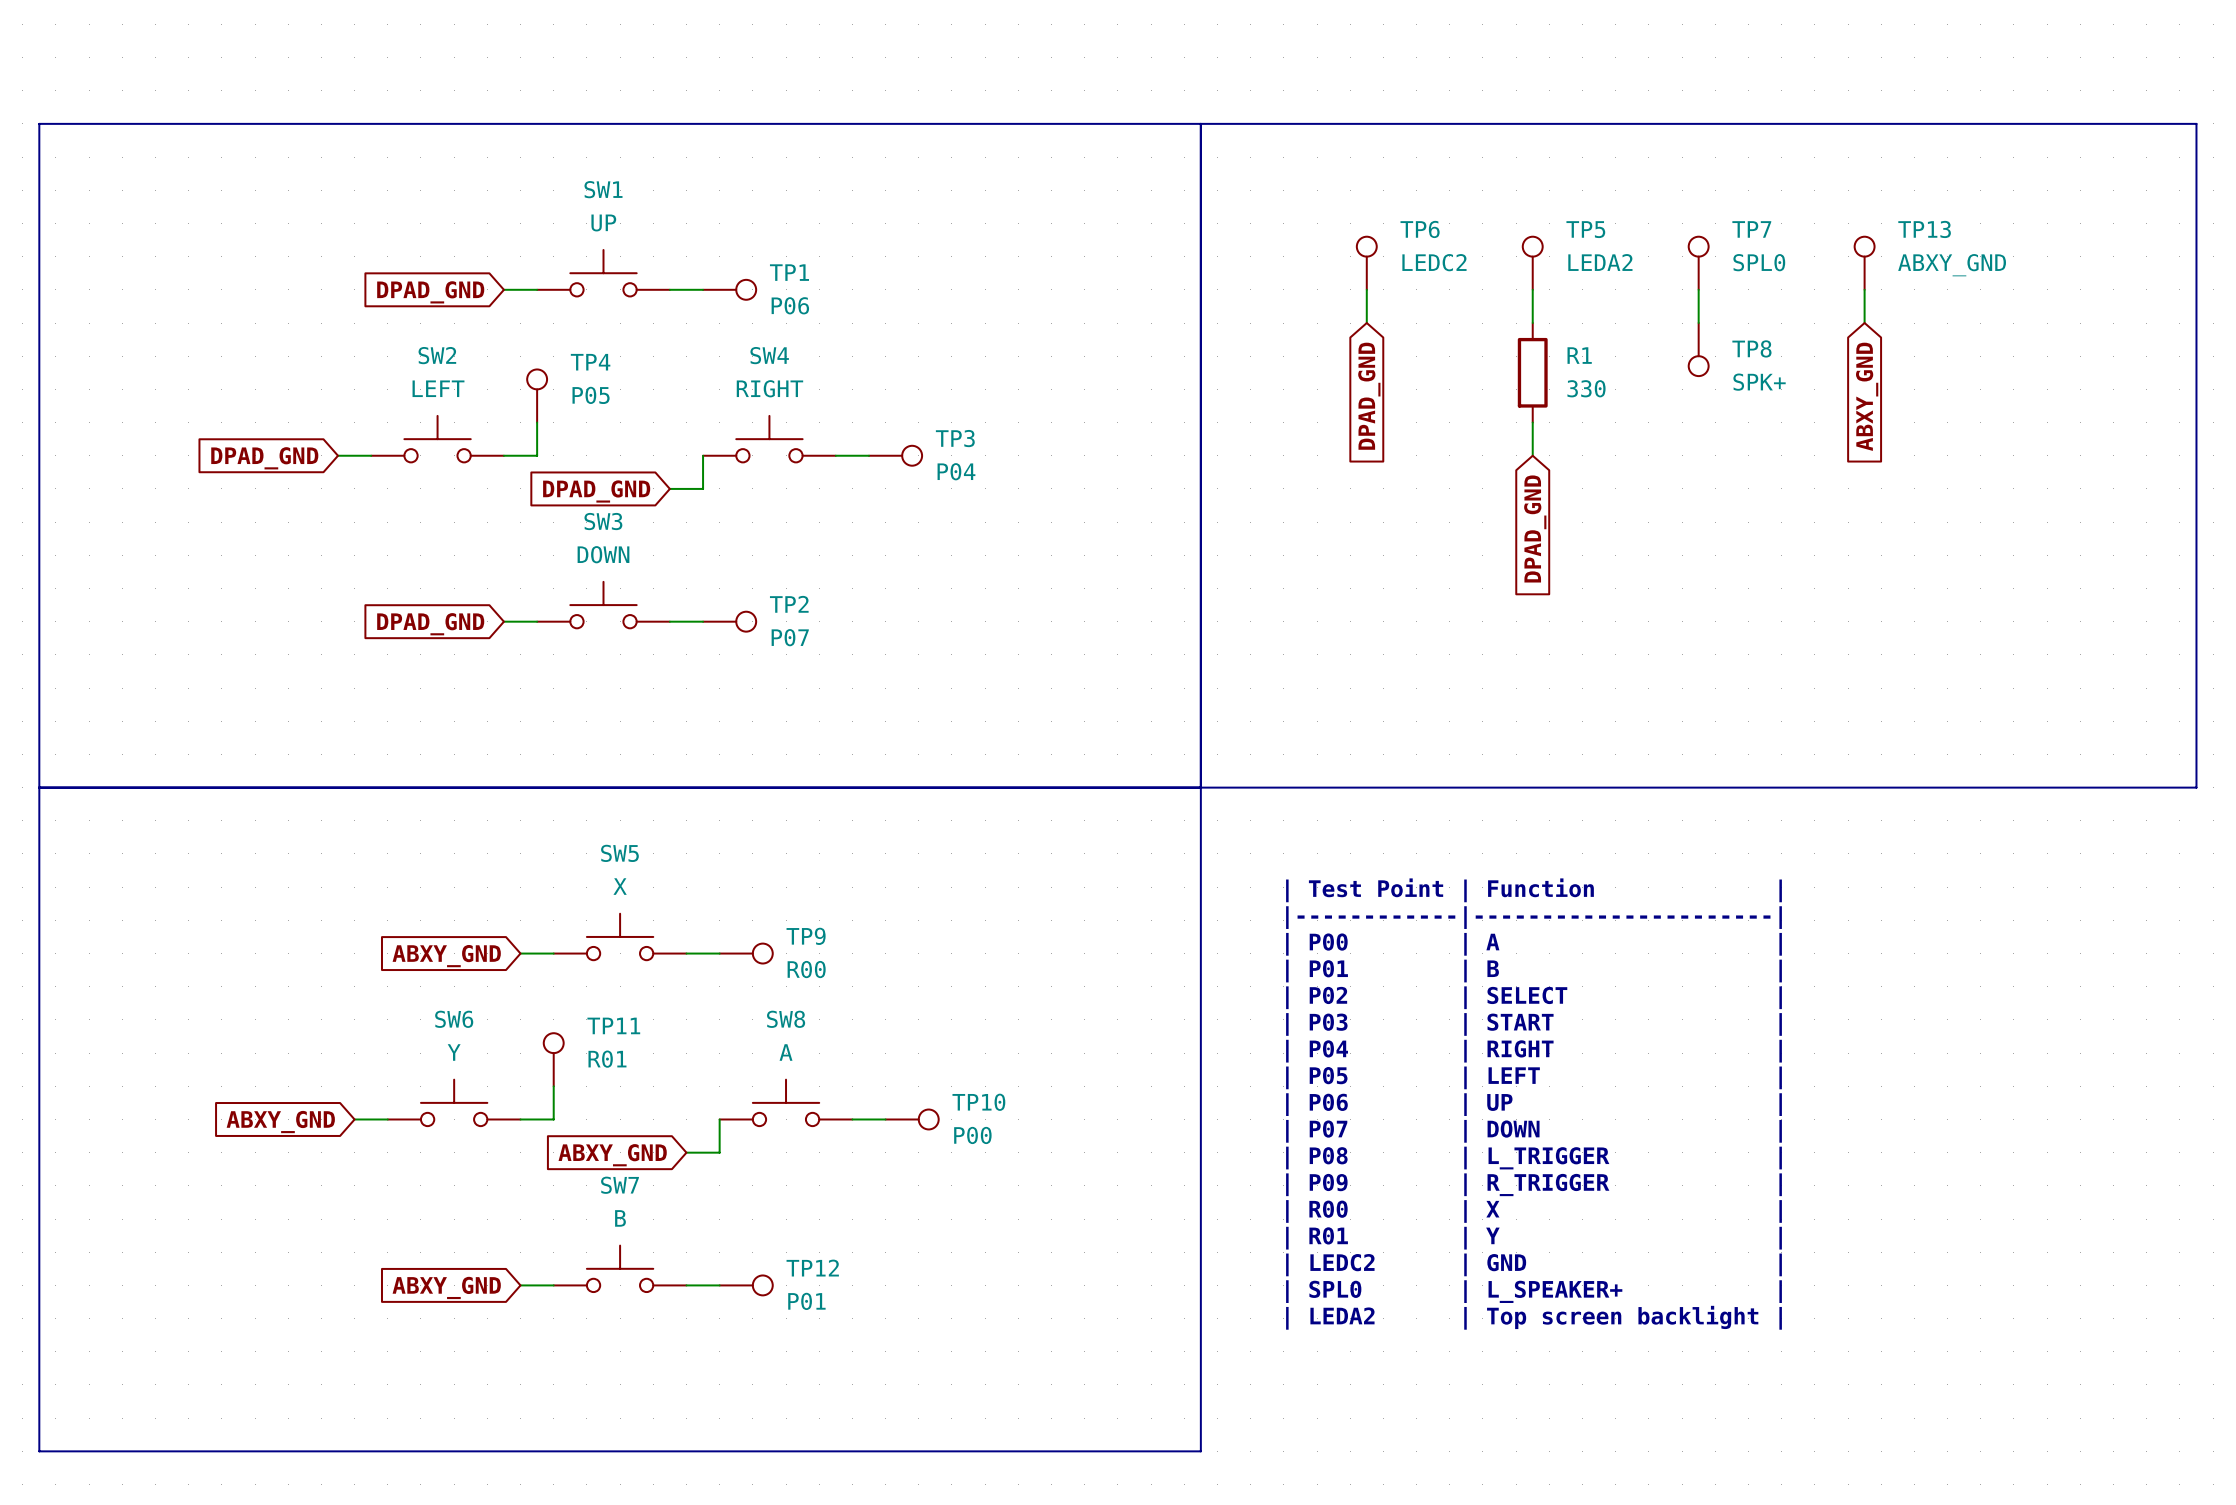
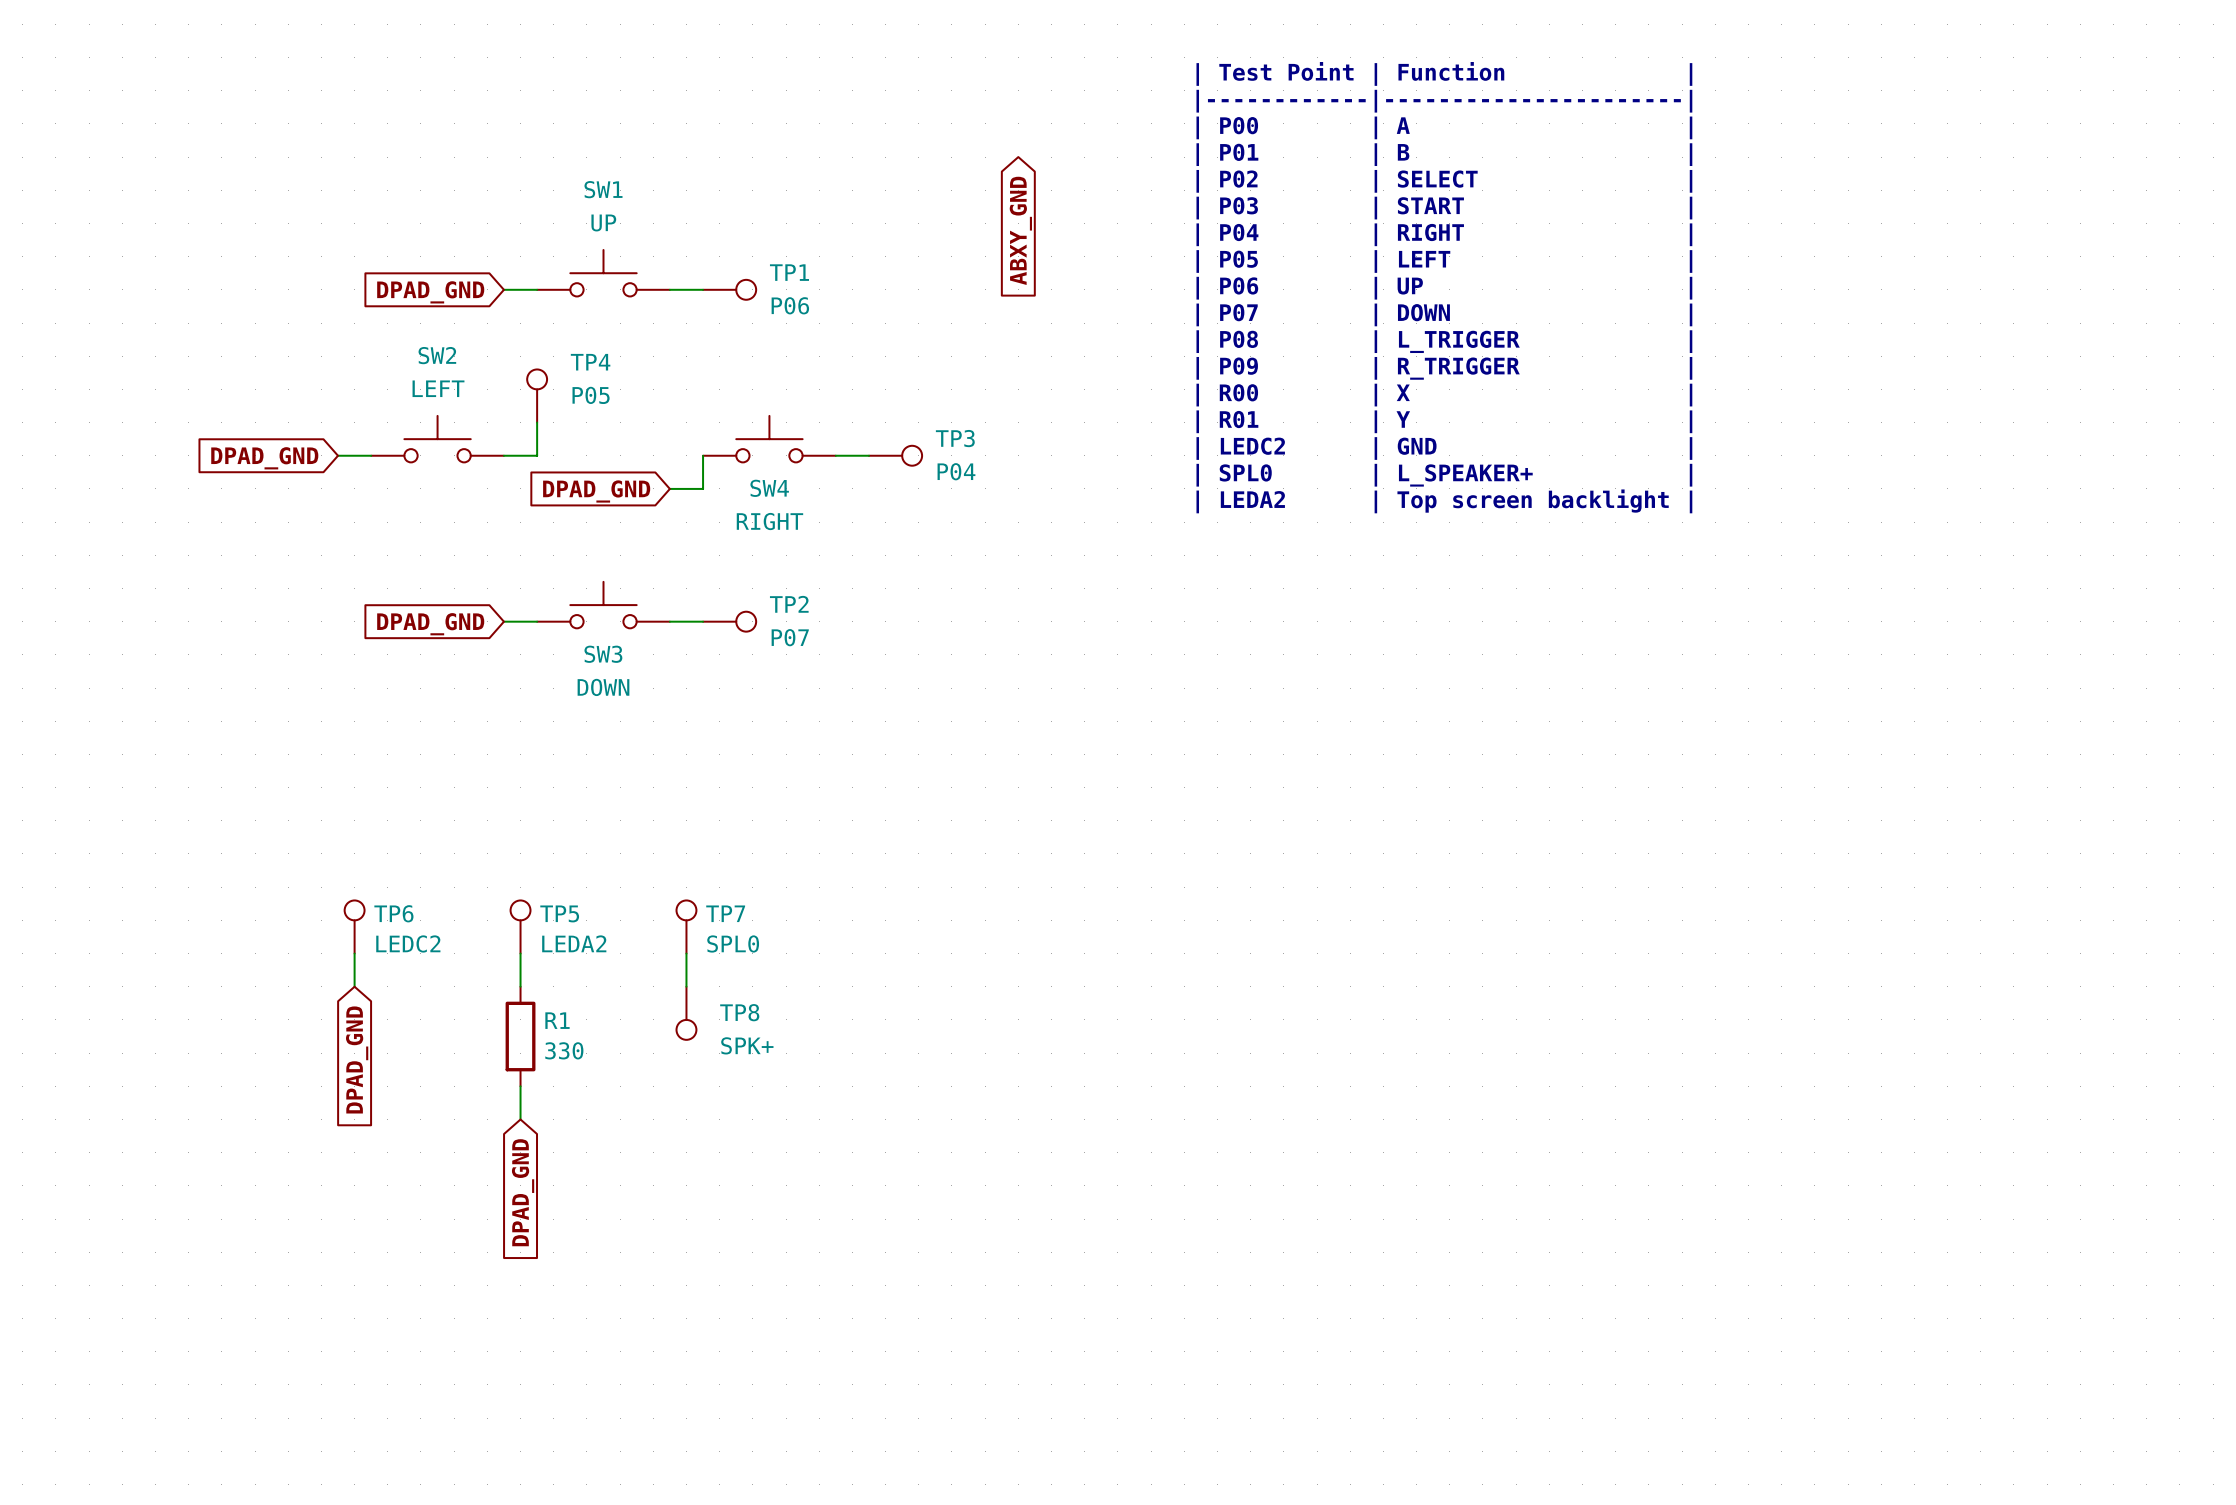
text: none -> | Test Point | Function | (1444, 73)
text: none -> |------------|----------------------| (1444, 101)
line: (1200, 123) (1200, 1451) (39, 1451) (39, 123) (2196, 123) (2196, 787) (39, 787) -> none
text: none -> | P00 | A | (1444, 127)
text: none -> | P01 | B | (1444, 154)
text: none -> | P02 | SELECT | (1444, 181)
text: none -> | P03 | START | (1444, 208)
TP6 name position: TP6 (1420, 229) -> TP6 (393, 913)
TP5 name position: TP5 (1585, 229) -> TP5 (559, 913)
TP7 name position: TP7 (1751, 229) -> TP7 (725, 913)
global label: none -> ABXY_GND (1020, 230)
text: none -> | P04 | RIGHT | (1444, 234)
text: none -> | P05 | LEFT | (1444, 261)
TP6 value position: LEDC2 (1434, 262) -> LEDC2 (408, 943)
TP5 value position: LEDA2 (1600, 262) -> LEDA2 (574, 943)
TP7 value position: SPL0 (1759, 262) -> SPL0 (733, 943)
TP6 position: (1366, 263) -> (354, 927)
TP5 position: (1532, 263) -> (520, 927)
TP7 position: (1698, 263) -> (686, 927)
TP13: ABXY_GND (1864, 263) -> none
text: none -> | P06 | UP | (1444, 288)
wire: (1366, 289) (1366, 323) -> none
wire: (1532, 289) (1532, 323) -> none
wire: (1698, 289) (1698, 323) -> none
wire: (1864, 289) (1864, 323) -> none
text: none -> | P07 | DOWN | (1444, 314)
text: none -> | P08 | L_TRIGGER | (1444, 341)
TP8 position: (1698, 349) -> (686, 1013)
SW4 name position: SW4 (769, 355) -> SW4 (769, 488)
R1 name position: R1 (1579, 355) -> R1 (557, 1020)
text: none -> | P09 | R_TRIGGER | (1444, 368)
R1 position: (1532, 372) -> (520, 1036)
SW4 value position: RIGHT (769, 388) -> RIGHT (769, 521)
R1 value position: 330 (1586, 388) -> 330 (564, 1050)
text: none -> | R00 | X | (1444, 395)
global label: DPAD_GND (1369, 396) -> none
global label: ABXY_GND (1867, 396) -> none
text: none -> | R01 | Y | (1444, 421)
wire: (1532, 422) (1532, 455) -> none
text: none -> | LEDC2 | GND | (1444, 448)
text: none -> | SPL0 | L_SPEAKER+ | (1444, 475)
text: none -> | LEDA2 | Top screen backlight | (1444, 501)
SW3 name position: SW3 (603, 521) -> SW3 (603, 654)
global label: DPAD_GND (1535, 528) -> none
SW3 value position: DOWN (603, 554) -> DOWN (603, 687)
text: | Test Point | Function | (1534, 890) -> none
text: |------------|----------------------| (1534, 917) -> none
SW5: X (620, 936) -> none
text: | P00 | A | (1534, 944) -> none
wire: none -> (354, 953) (354, 986)
wire: (520, 953) (553, 953) -> (520, 953) (520, 986)
wire: (686, 953) (719, 953) -> (686, 953) (686, 986)
TP9: R00 (746, 953) -> none
global label: ABXY_GND (446, 956) -> none
text: | P01 | B | (1534, 971) -> none
text: | P02 | SELECT | (1534, 997) -> none
text: | P03 | START | (1534, 1024) -> none
text: | P04 | RIGHT | (1534, 1051) -> none
TP11: R01 (553, 1059) -> none
text: | P05 | LEFT | (1534, 1077) -> none
wire: (553, 1086) (553, 1119) (520, 1119) -> (520, 1086) (520, 1119)
SW6: Y (454, 1102) -> none
SW8: A (786, 1102) -> none
text: | P06 | UP | (1534, 1104) -> none
wire: (354, 1119) (387, 1119) -> none
wire: (719, 1119) (719, 1152) (686, 1152) -> none
wire: (852, 1119) (885, 1119) -> none
TP10: P00 (912, 1119) -> none
global label: ABXY_GND (280, 1122) -> DPAD_GND (357, 1059)
text: | P07 | DOWN | (1534, 1131) -> none
global label: ABXY_GND (612, 1155) -> none
text: | P08 | L_TRIGGER | (1534, 1158) -> none
text: | P09 | R_TRIGGER | (1534, 1184) -> none
global label: none -> DPAD_GND (523, 1192)
text: | R00 | X | (1534, 1211) -> none
text: | R01 | Y | (1534, 1238) -> none
text: | LEDC2 | GND | (1534, 1264) -> none
SW7: B (620, 1268) -> none
wire: (520, 1285) (553, 1285) -> none
wire: (686, 1285) (719, 1285) -> none
TP12: P01 (746, 1285) -> none
global label: ABXY_GND (446, 1287) -> none
text: | SPL0 | L_SPEAKER+ | (1534, 1291) -> none
text: | LEDA2 | Top screen backlight | (1534, 1317) -> none

